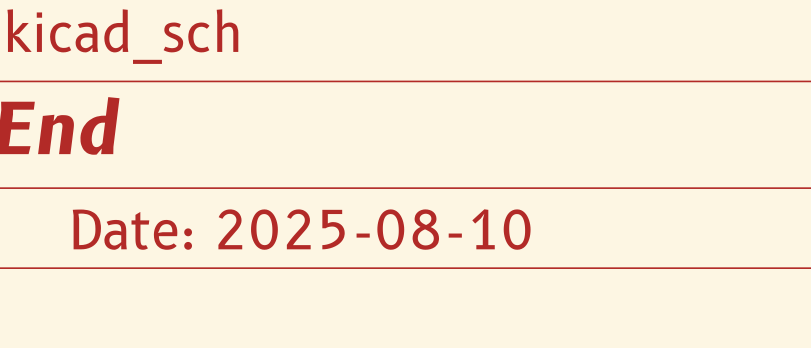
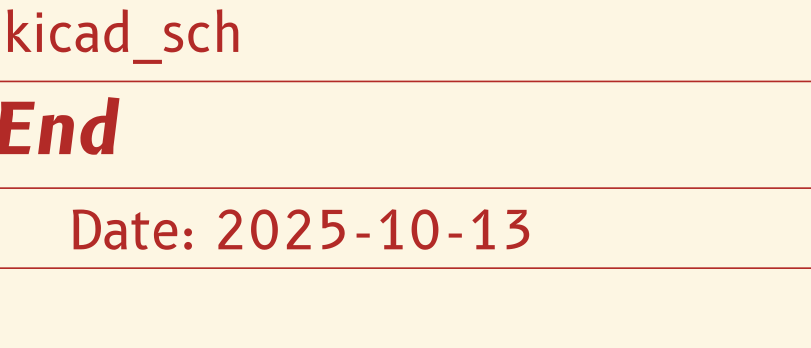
title block: Date: 2025-08-10 (301, 229) -> Date: 2025-10-13 (301, 229)

